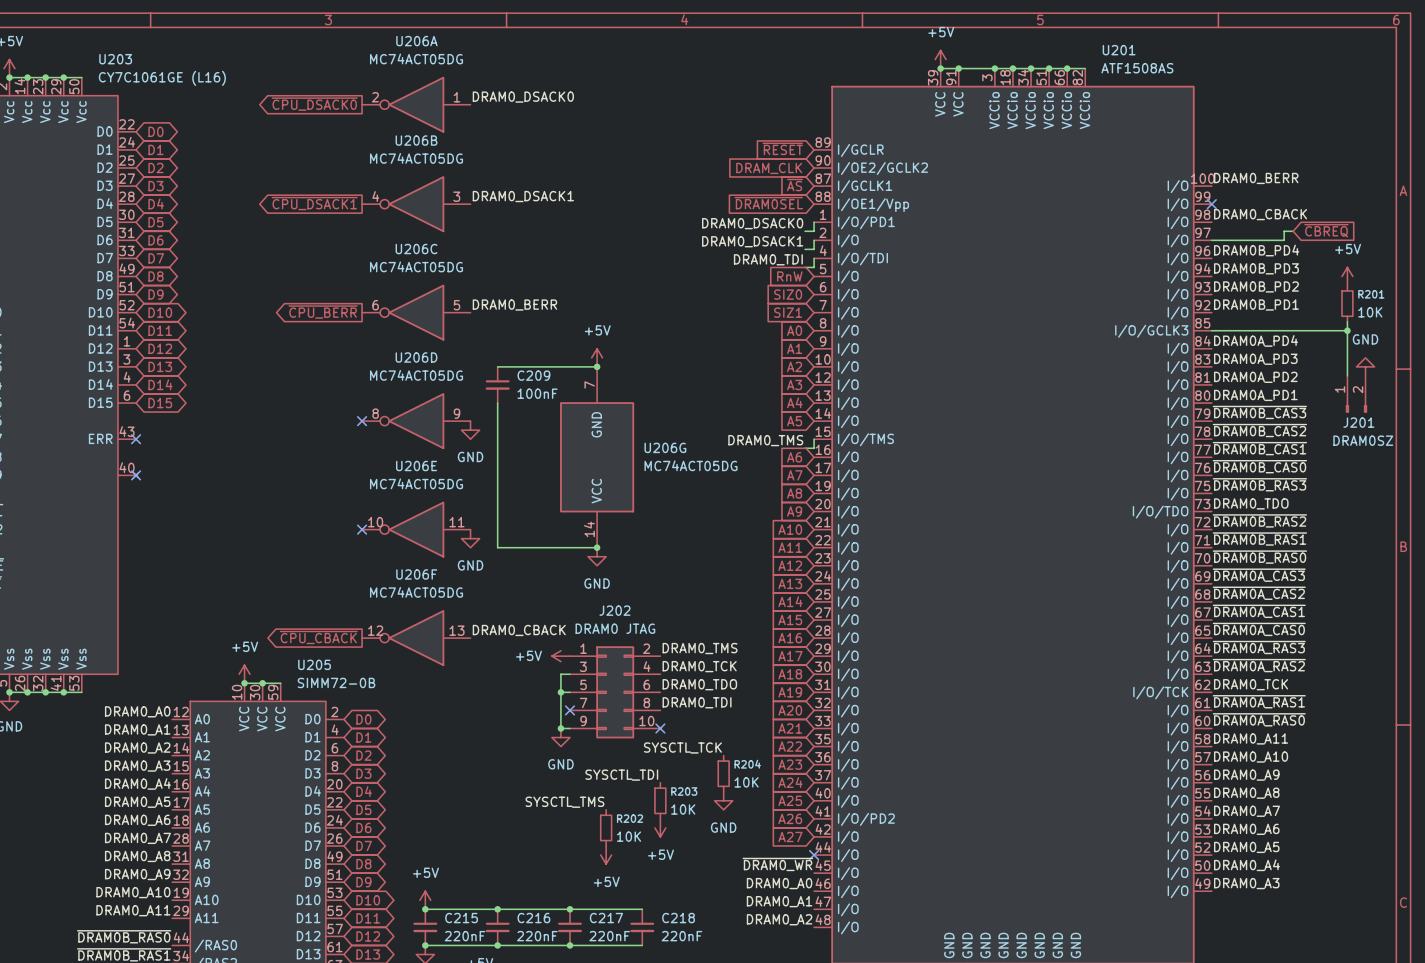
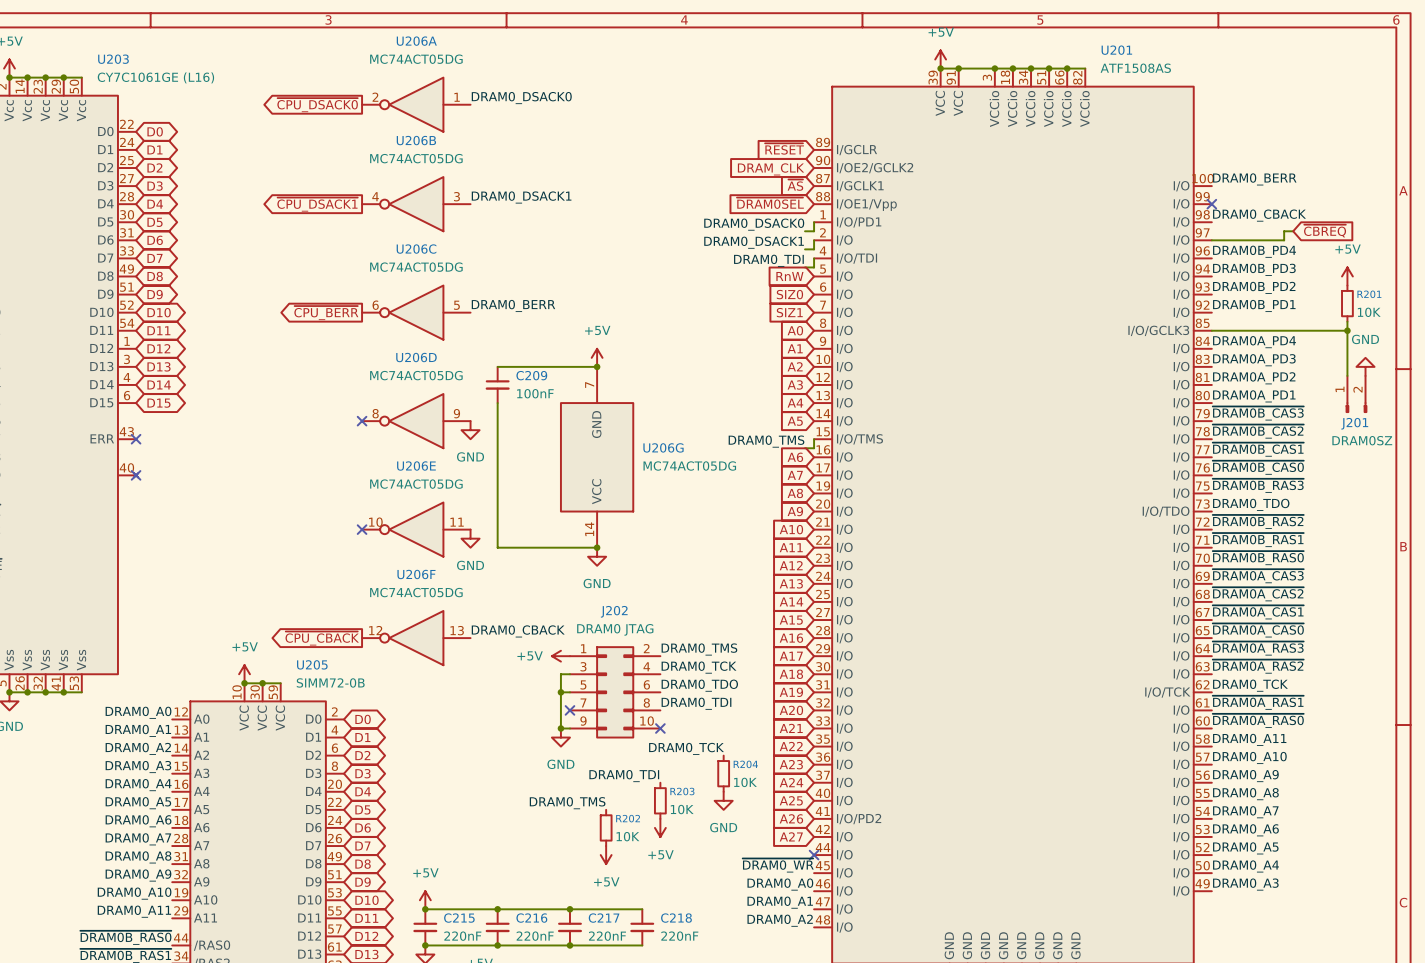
label: SYSCTL_TCK (682, 747) -> DRAM0_TCK (686, 748)
label: SYSCTL_TDI (621, 775) -> DRAM0_TDI (624, 776)
label: SYSCTL_TMS (564, 802) -> DRAM0_TMS (567, 803)

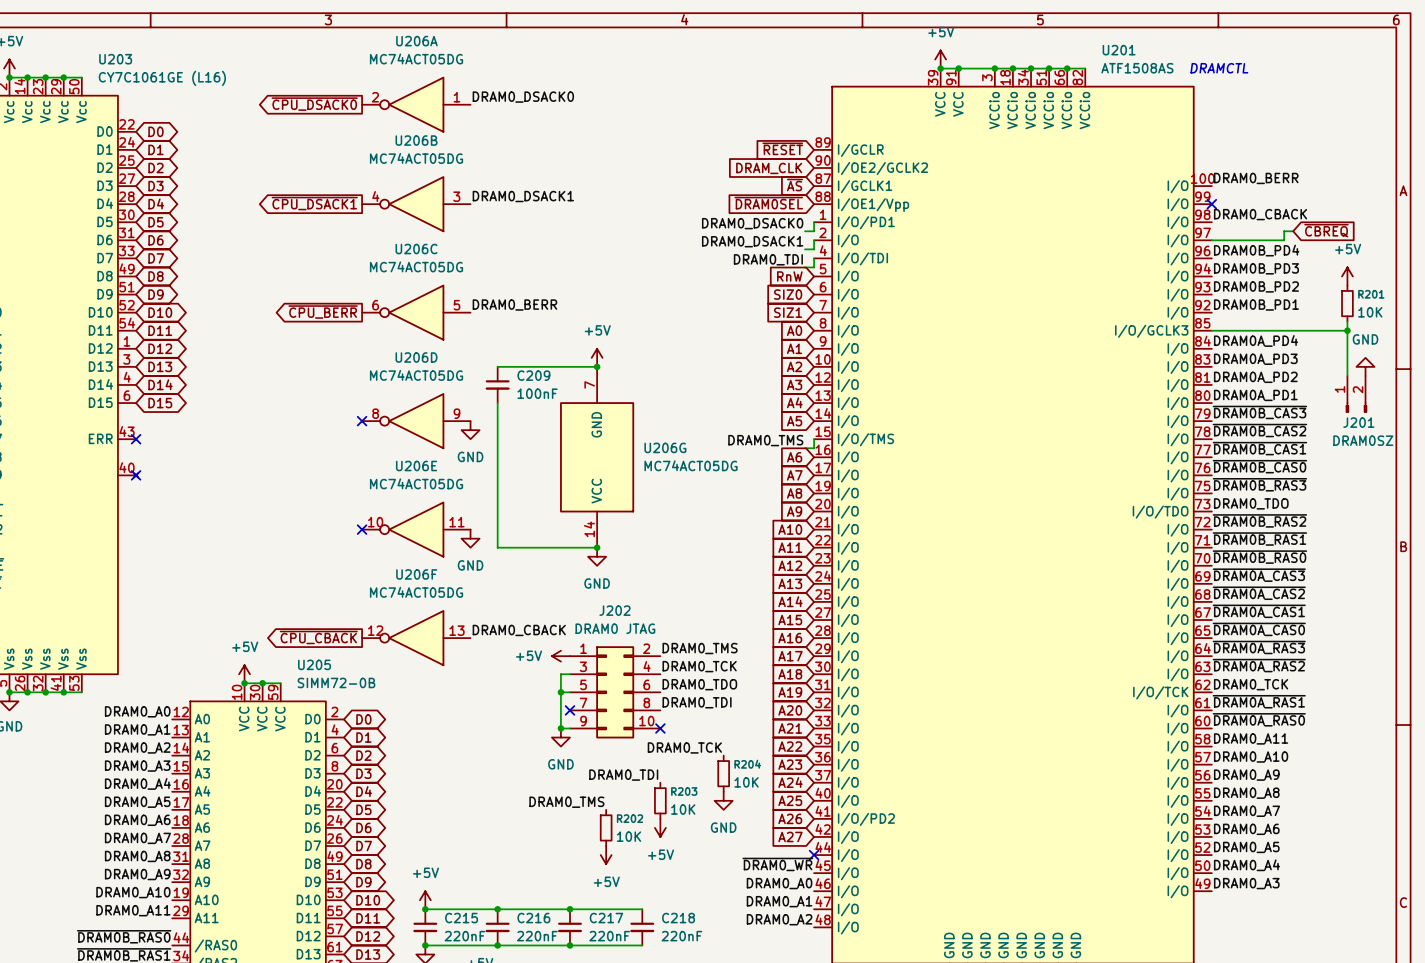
text: none -> DRAMCTL (1219, 68)

